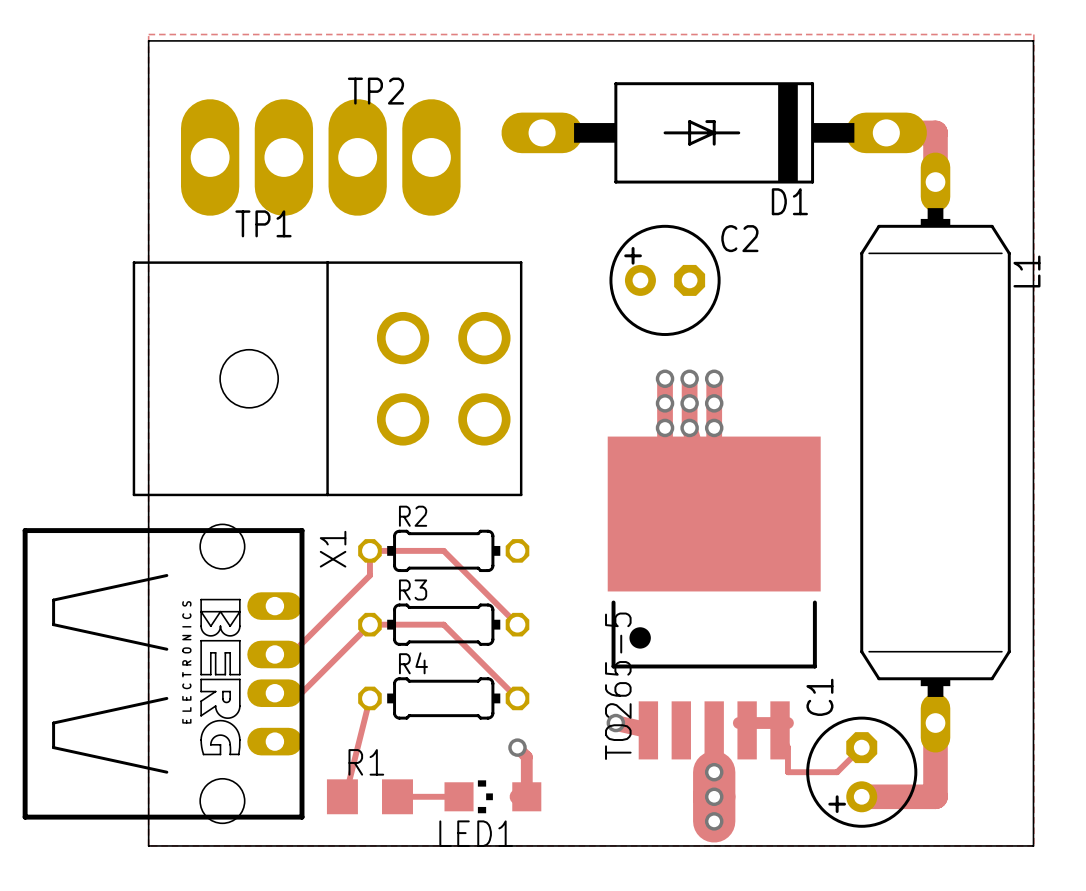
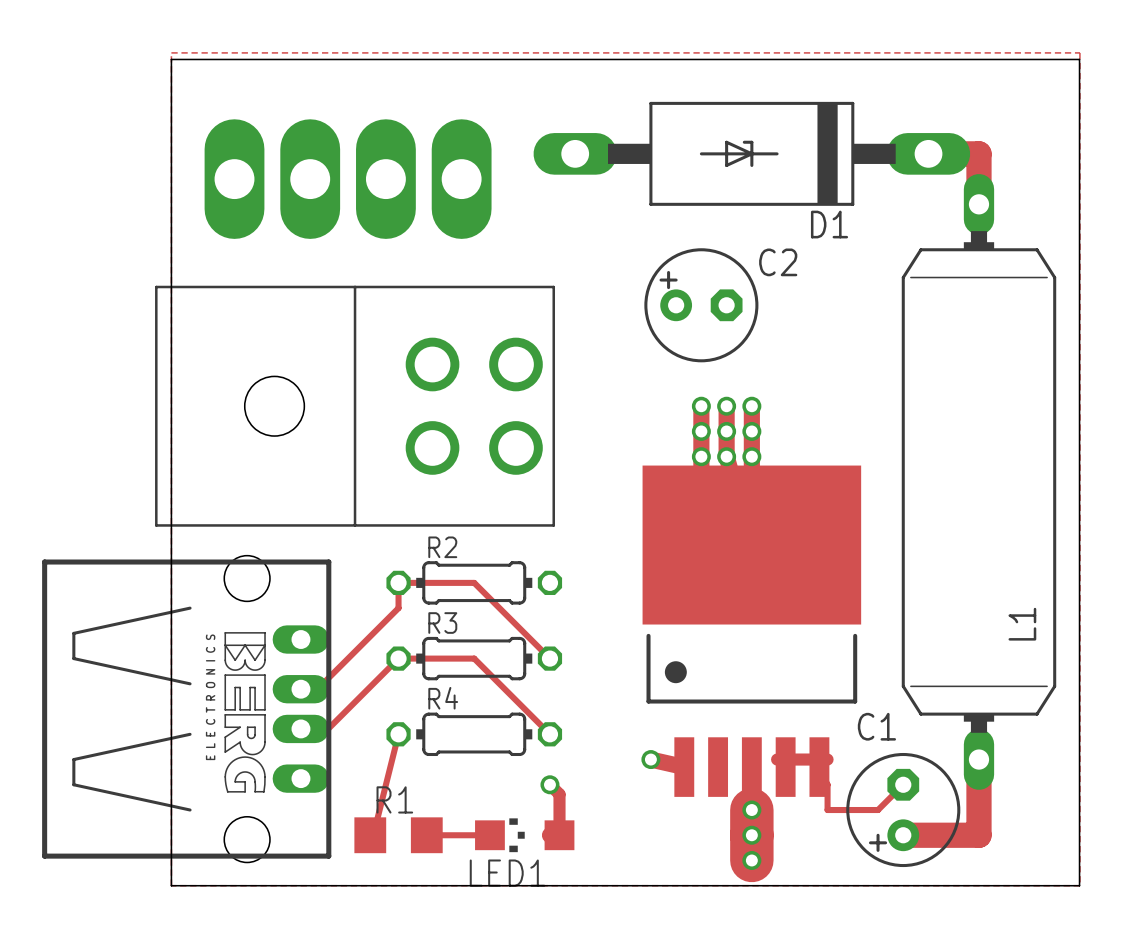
TP2 name: TP2 (375, 91) -> none
TP1 name: TP1 (263, 223) -> none
L1 name position: L1 (1026, 271) -> L1 (1022, 624)
X1 name: X1 (333, 549) -> none
TO265-5 name: TO265-5 (618, 686) -> none
C1 name rotation: 0° (819, 697) -> 90° clockwise (876, 726)

